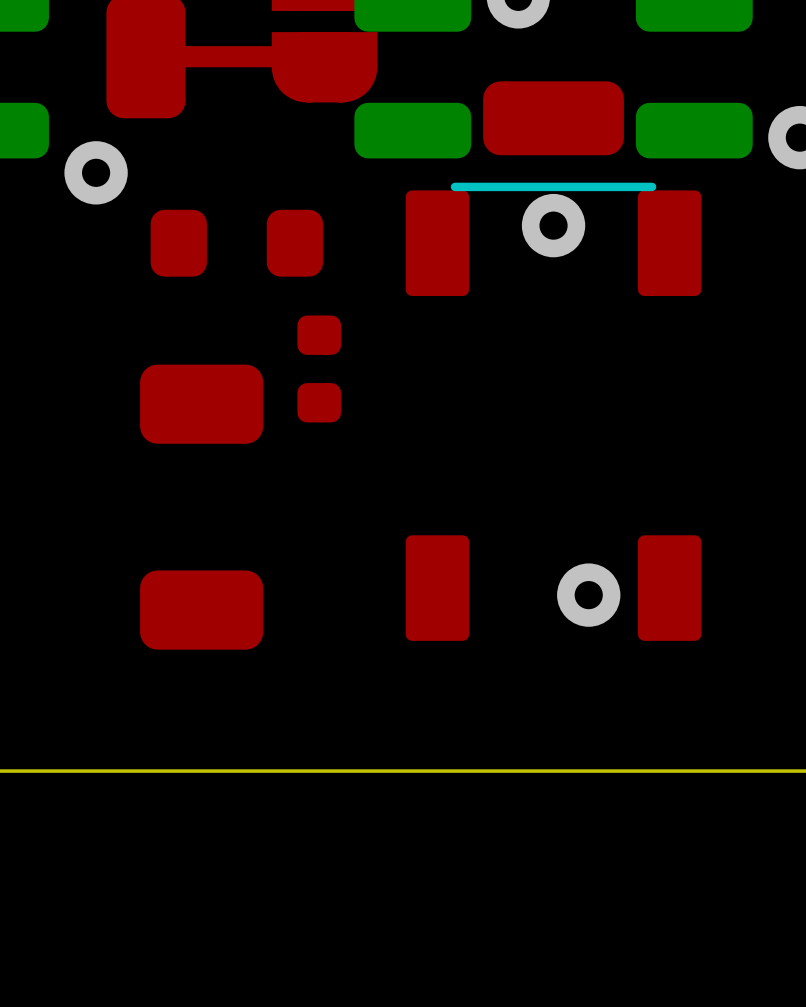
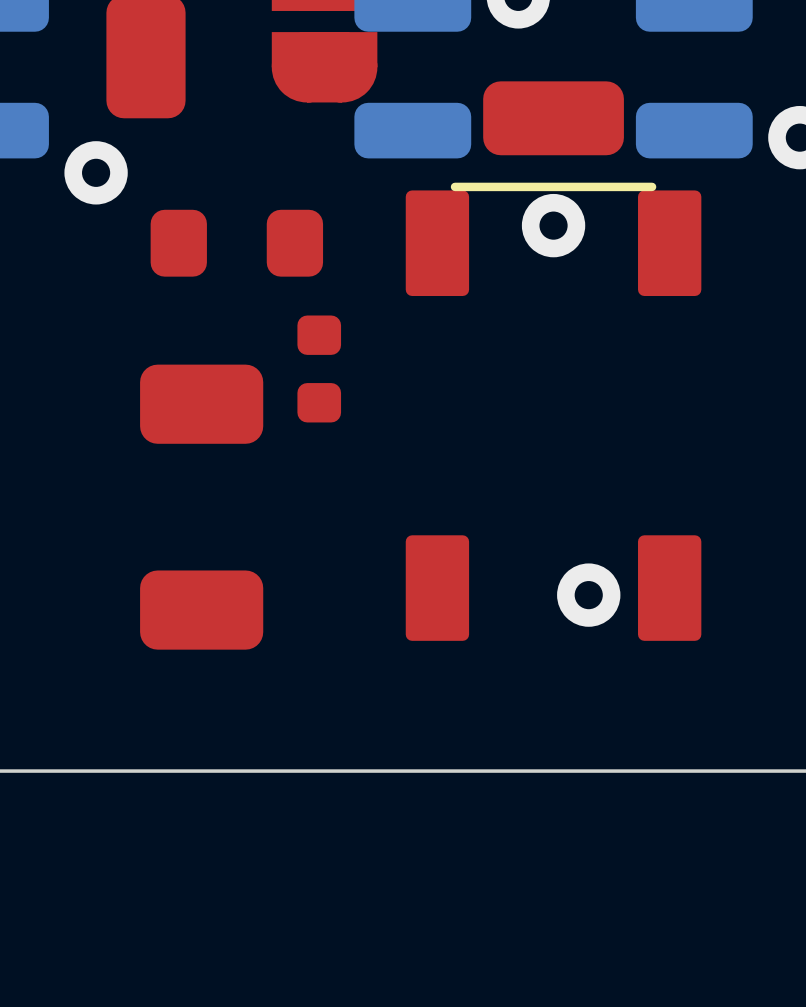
top track: (146, 56) (314, 56) (324, 67) -> none

